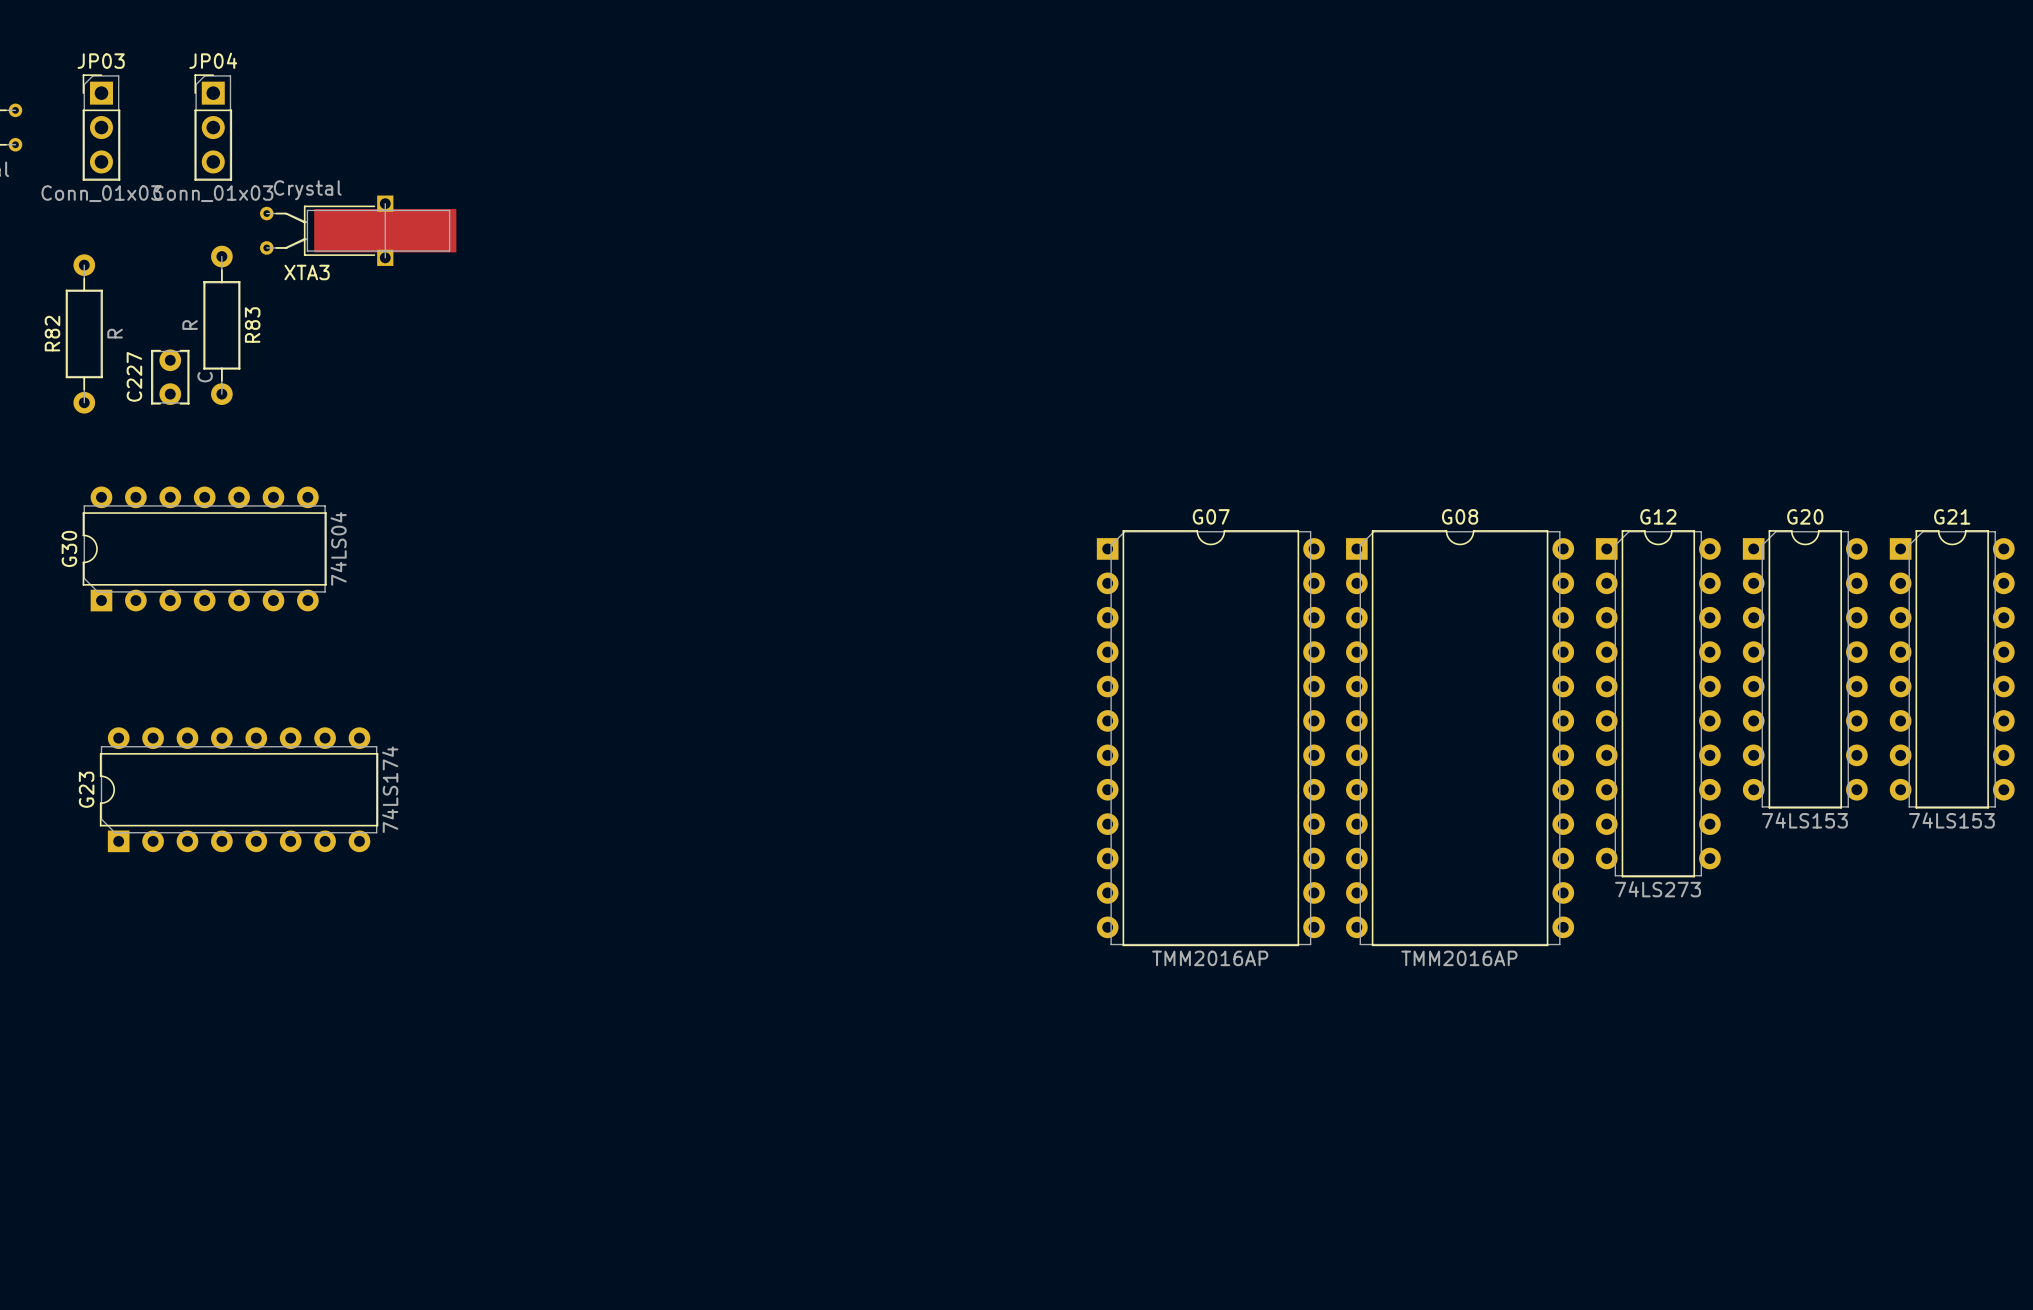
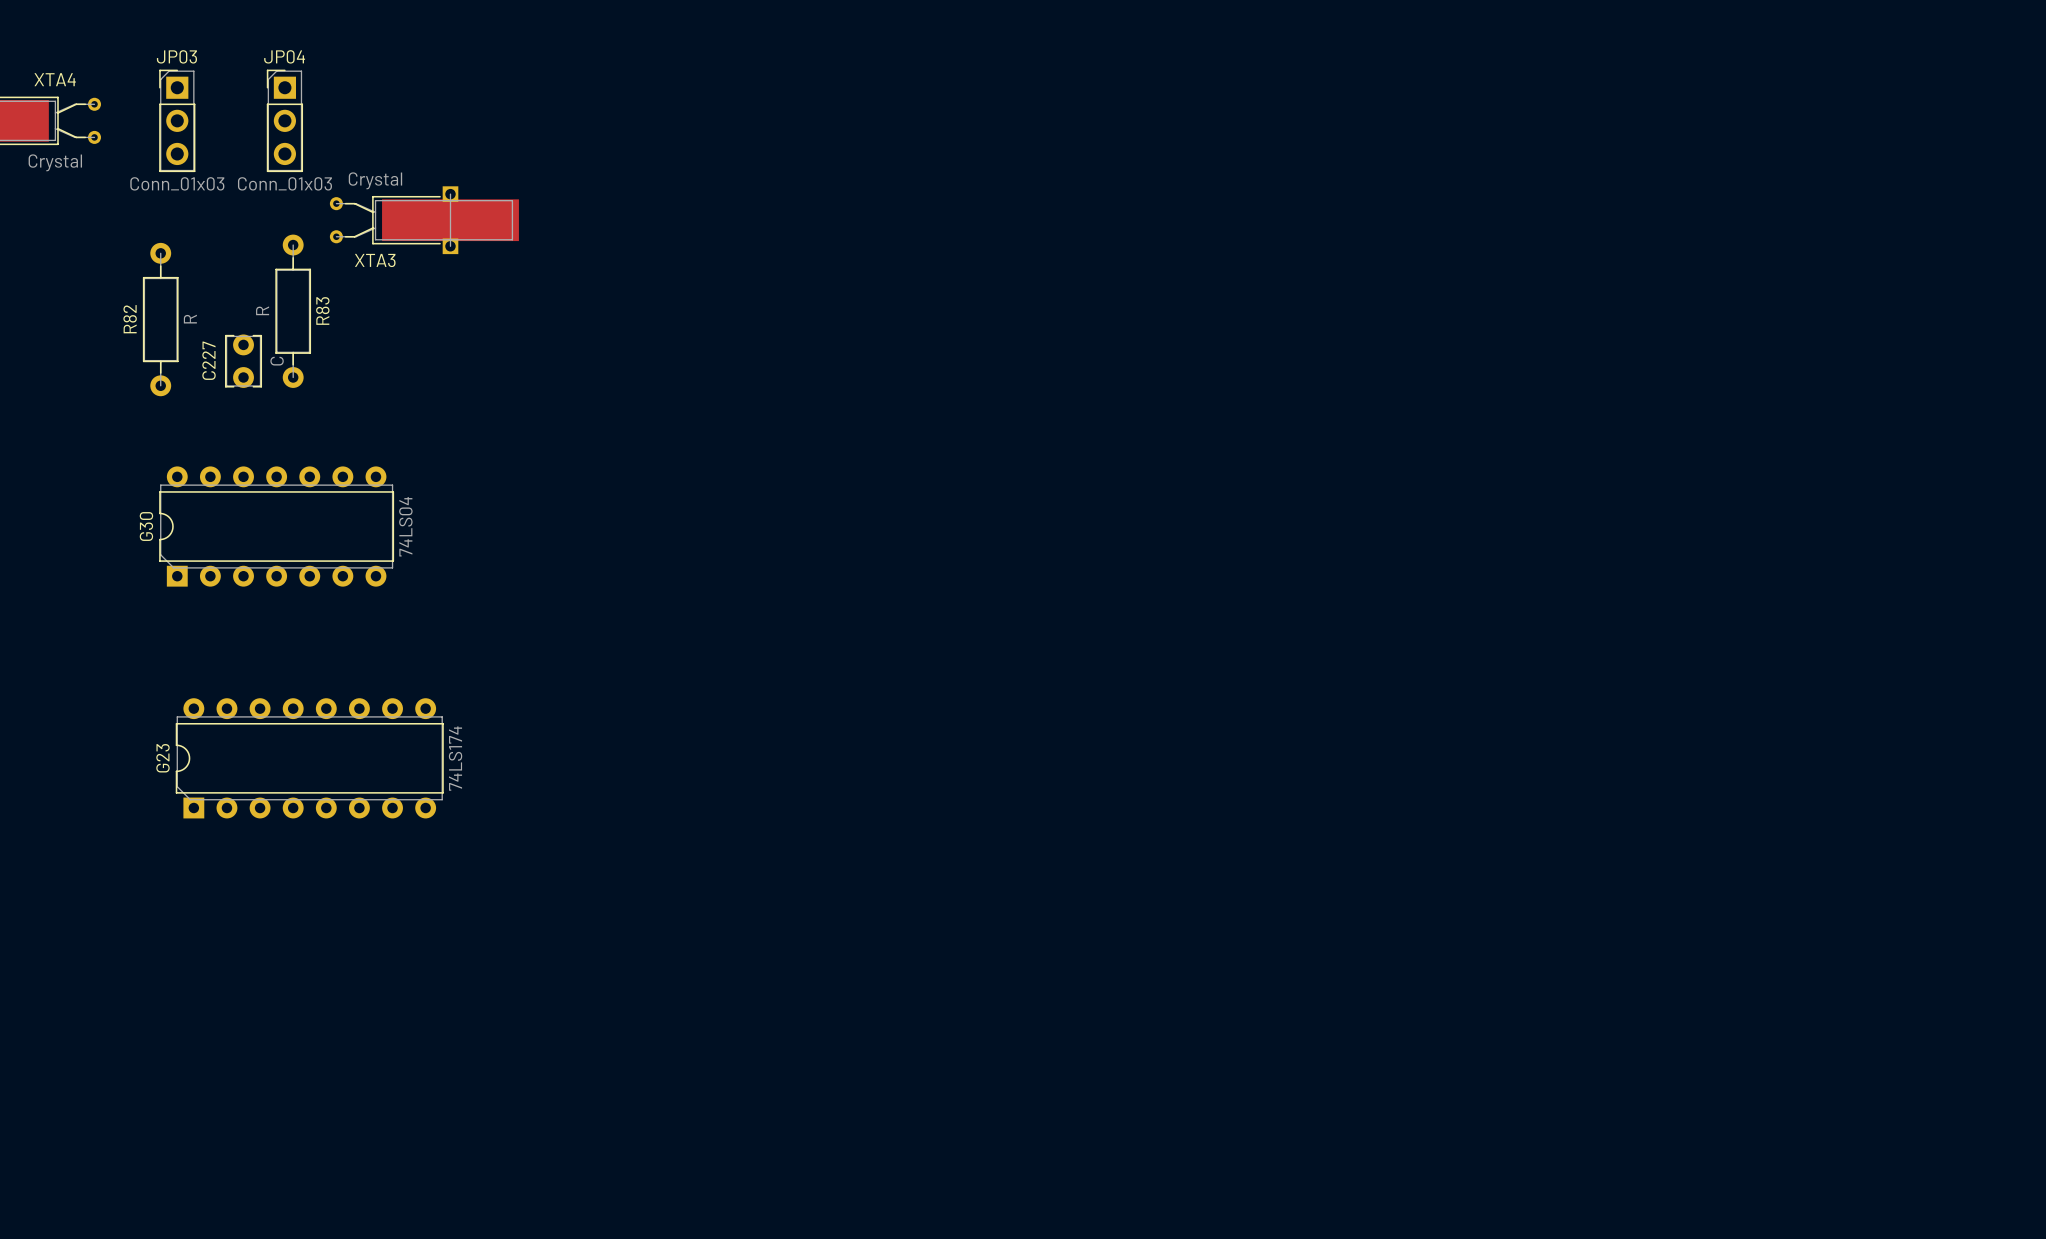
G20: 74LS153 (1805, 669) -> none
G21: 74LS153 (1952, 669) -> none
G12: 74LS273 (1658, 703) -> none
G07: TMM2016AP (1210, 738) -> none
G08: TMM2016AP (1460, 738) -> none

